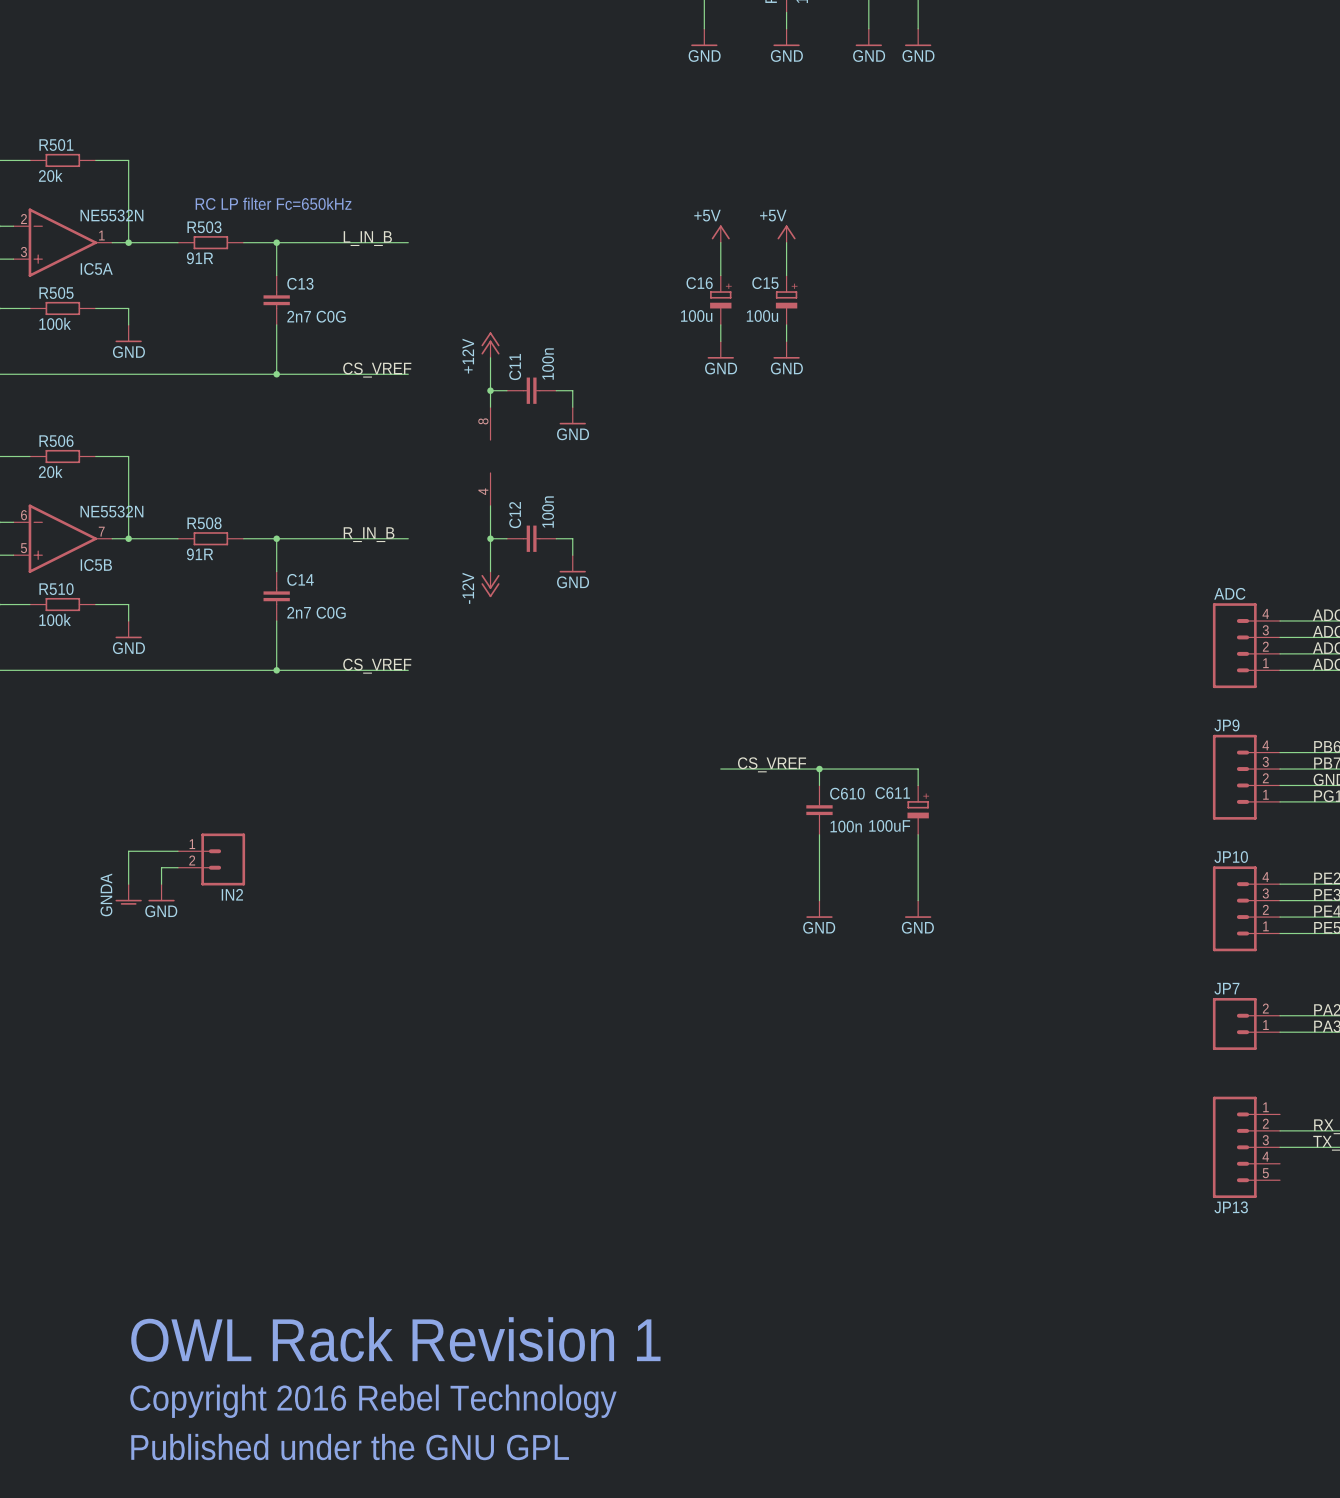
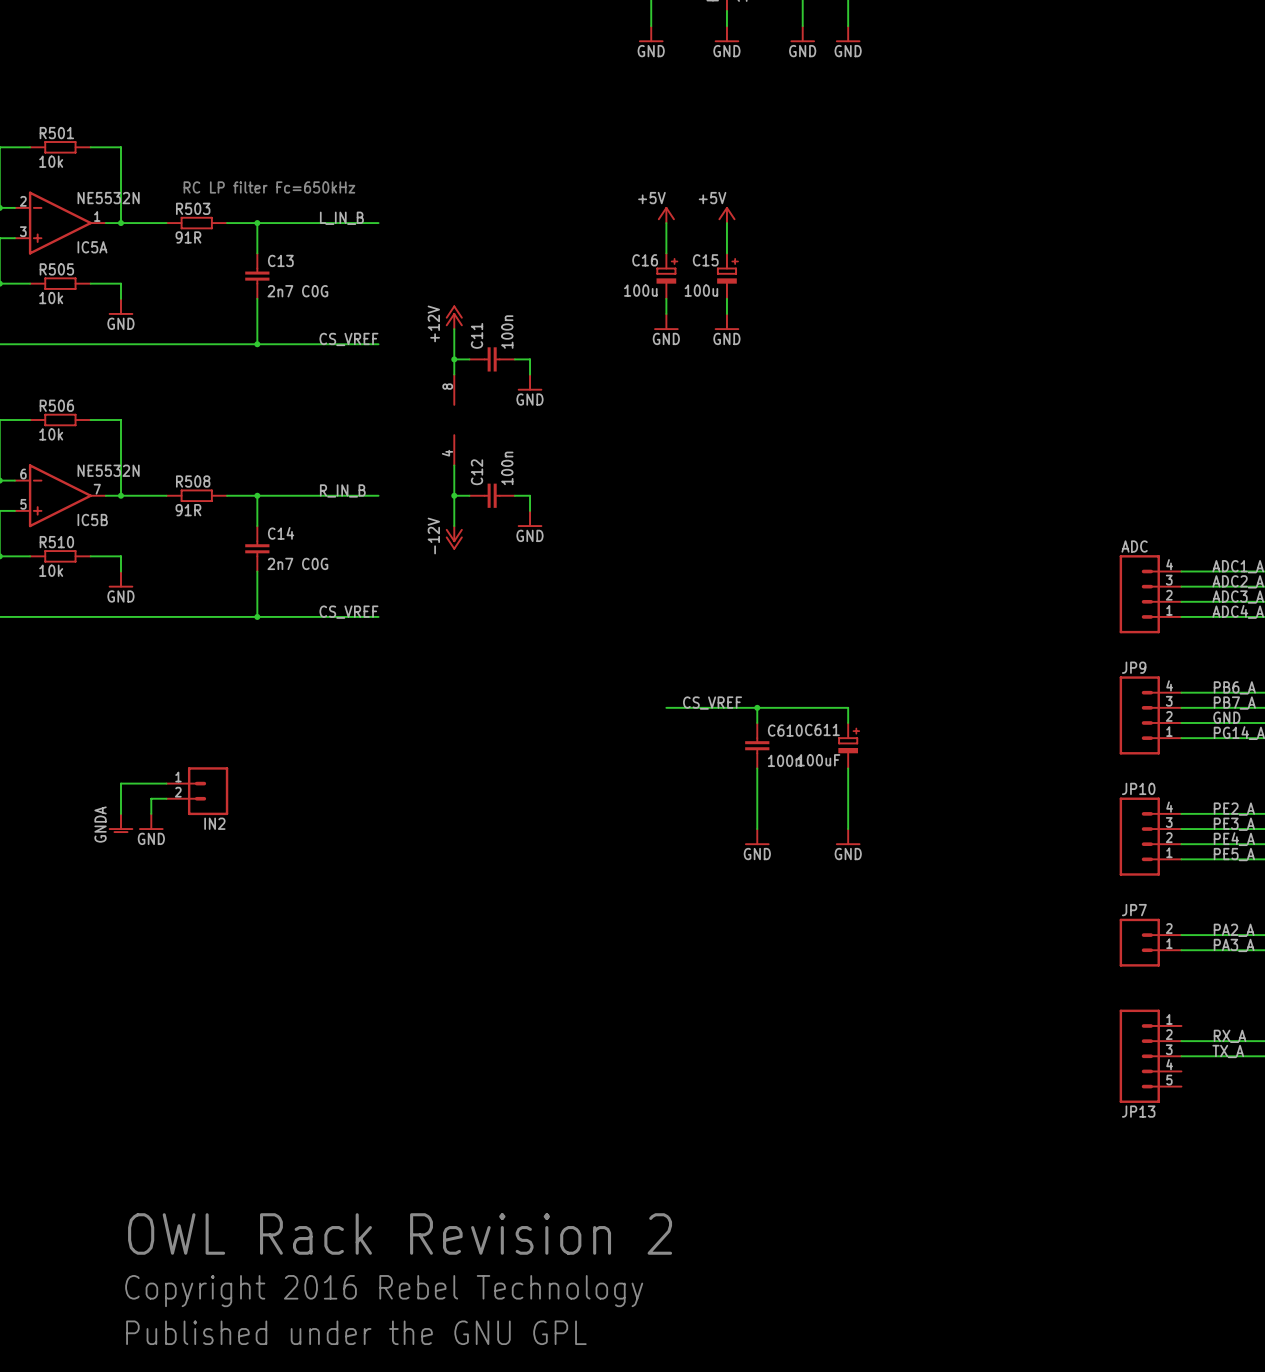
R501 value: 20k (50, 175) -> 10k (51, 161)
R505 value: 100k (55, 323) -> 10k (51, 298)
R506 value: 20k (50, 471) -> 10k (51, 434)
R510 value: 100k (55, 619) -> 10k (51, 570)
text: OWL Rack Revision 1 (395, 1339) -> OWL Rack Revision 2 (400, 1233)

